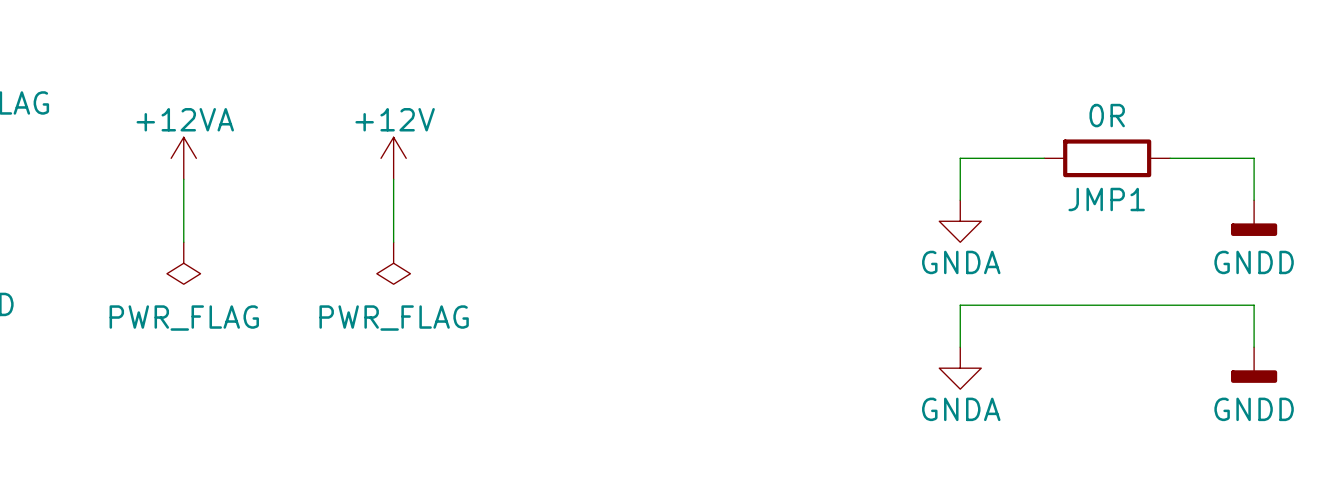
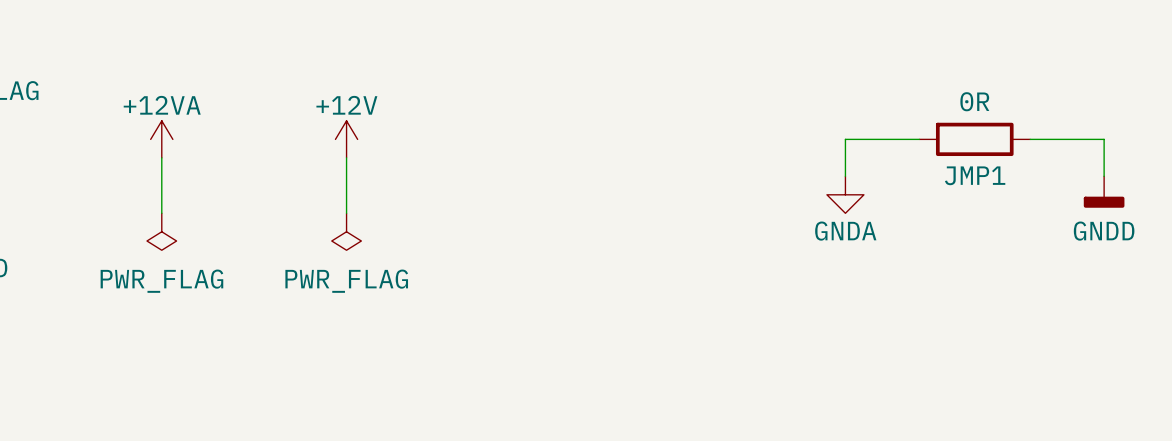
wire: (960, 347) (960, 305) (1254, 305) (1254, 347) -> none
power symbol: GNDD (1254, 365) -> none
power symbol: GNDA (960, 368) -> none

